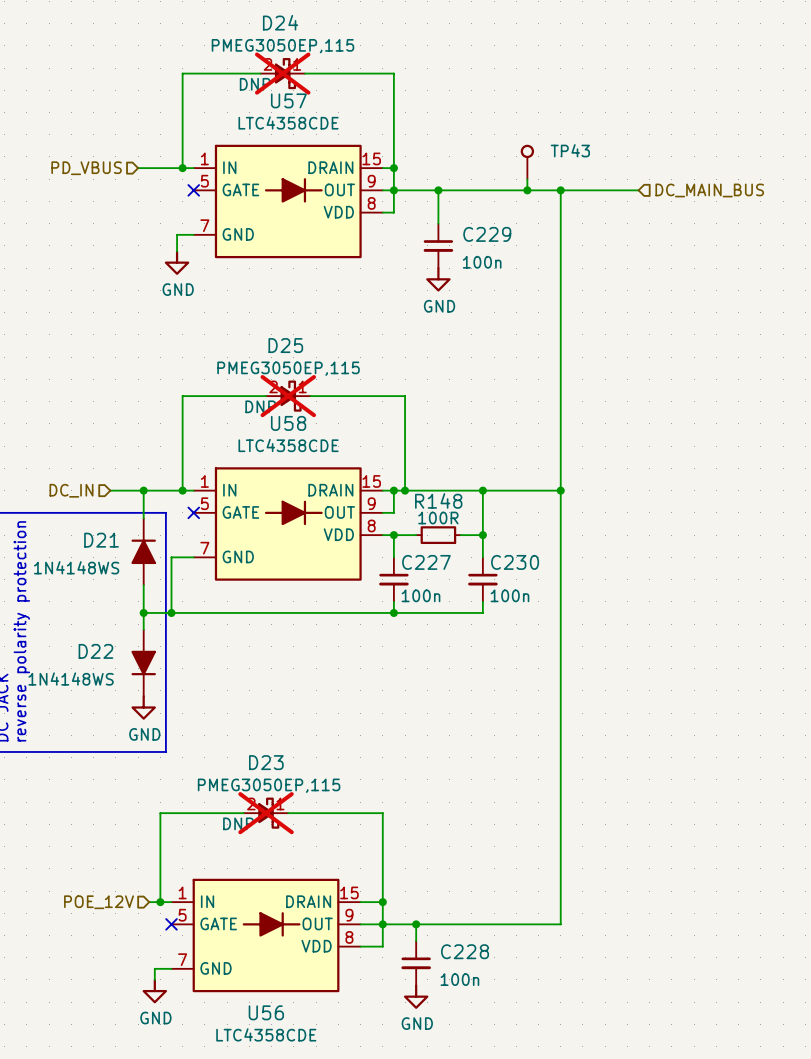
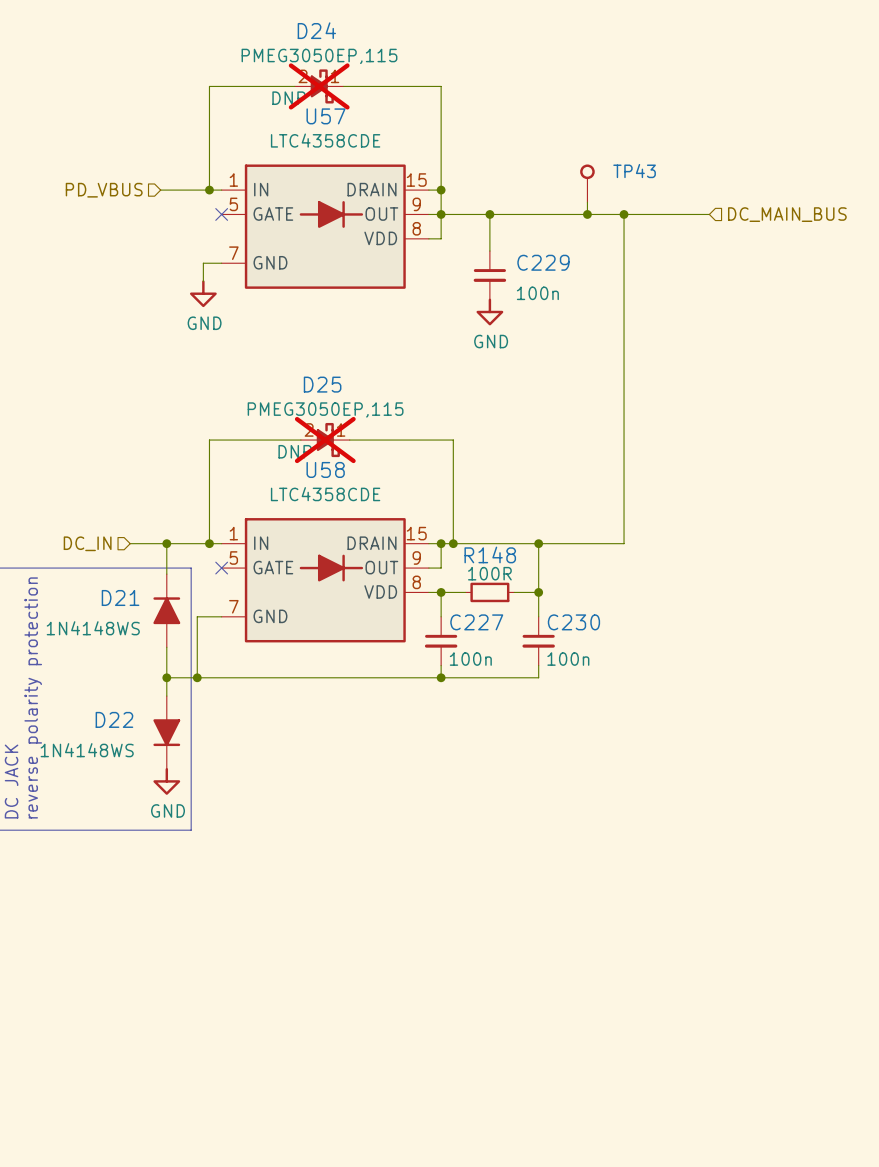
wire: (560, 490) (560, 924) (360, 924) -> none
junction: (560, 490) -> none
wire: (243, 813) (160, 813) (160, 902) -> none
D23: (266, 813) -> none
wire: (288, 813) (382, 813) (382, 946) (360, 946) -> none
hierarchical label: POE_12V (99, 902) -> none
wire: (149, 902) (171, 902) -> none
junction: (160, 902) -> none
wire: (360, 902) (382, 902) -> none
junction: (382, 902) -> none
no-connect mark: (171, 924) -> none
junction: (382, 924) -> none
wire: (416, 924) (416, 941) -> none
junction: (416, 924) -> none
U56: LTC4358CDE (266, 935) -> none
C228: (416, 963) -> none
wire: (171, 968) (154, 968) (154, 979) -> none
power symbol: GND (154, 991) -> none
power symbol: GND (416, 996) -> none

